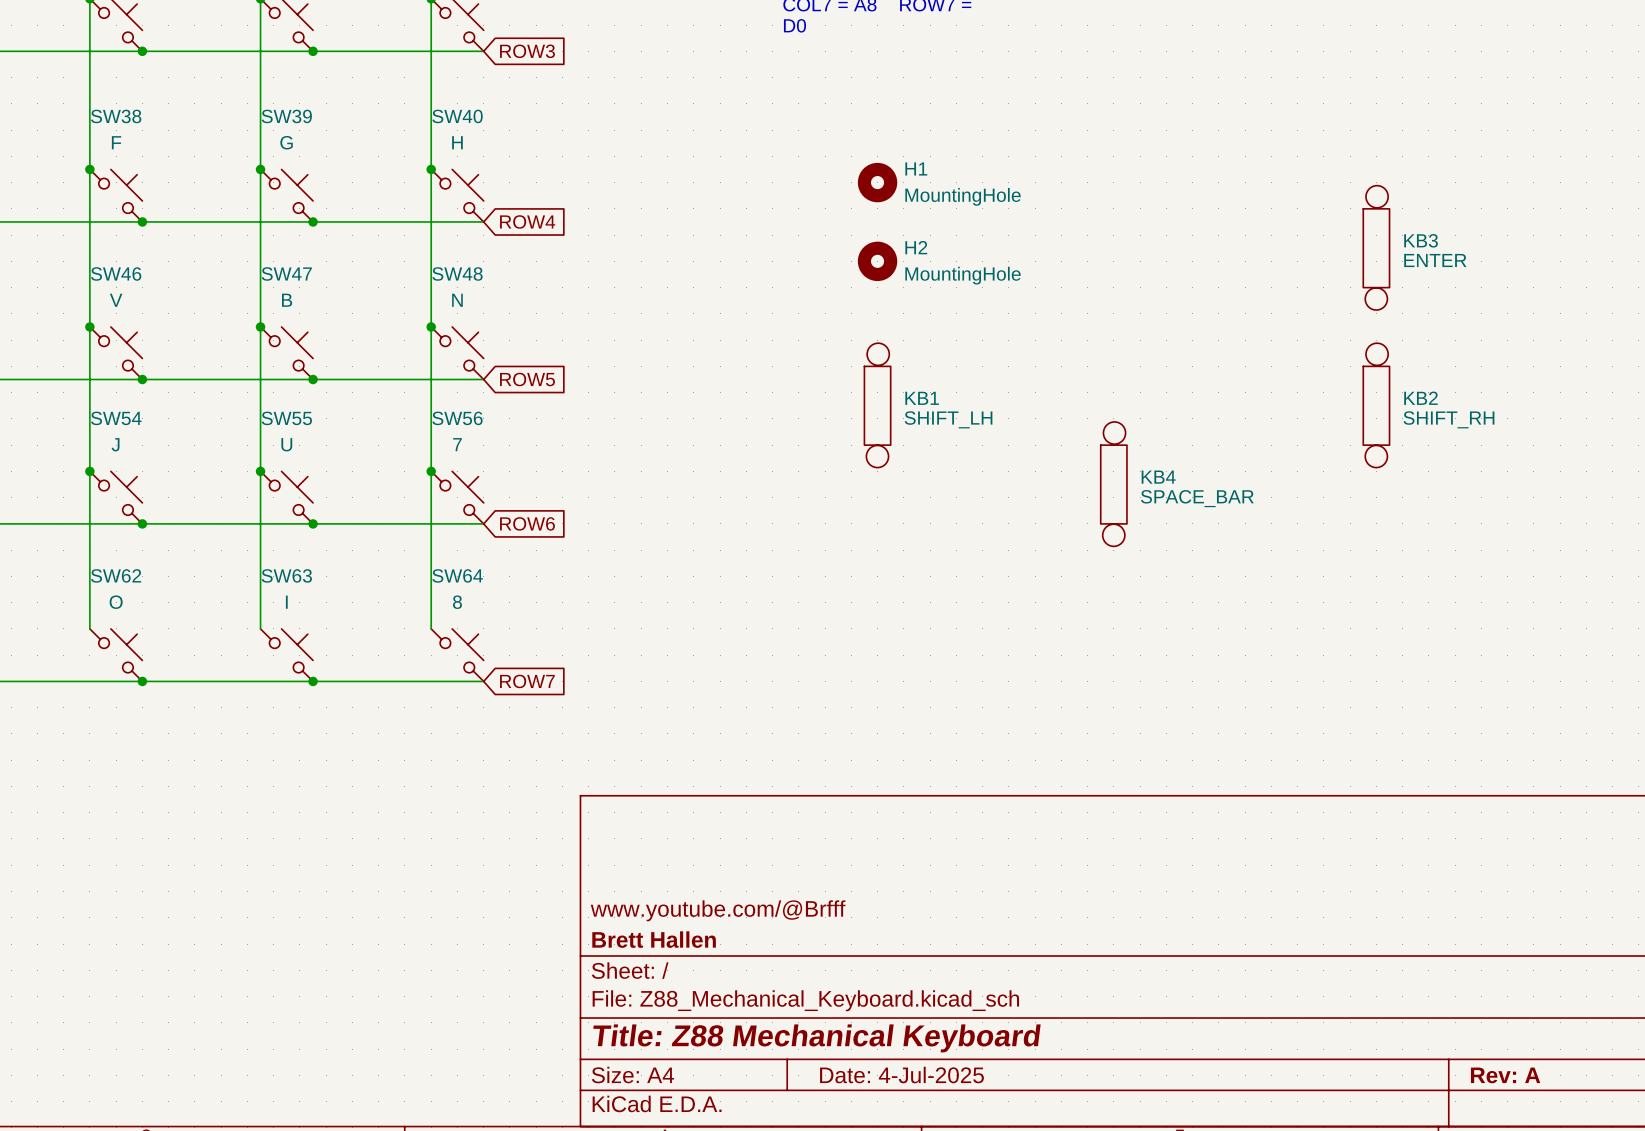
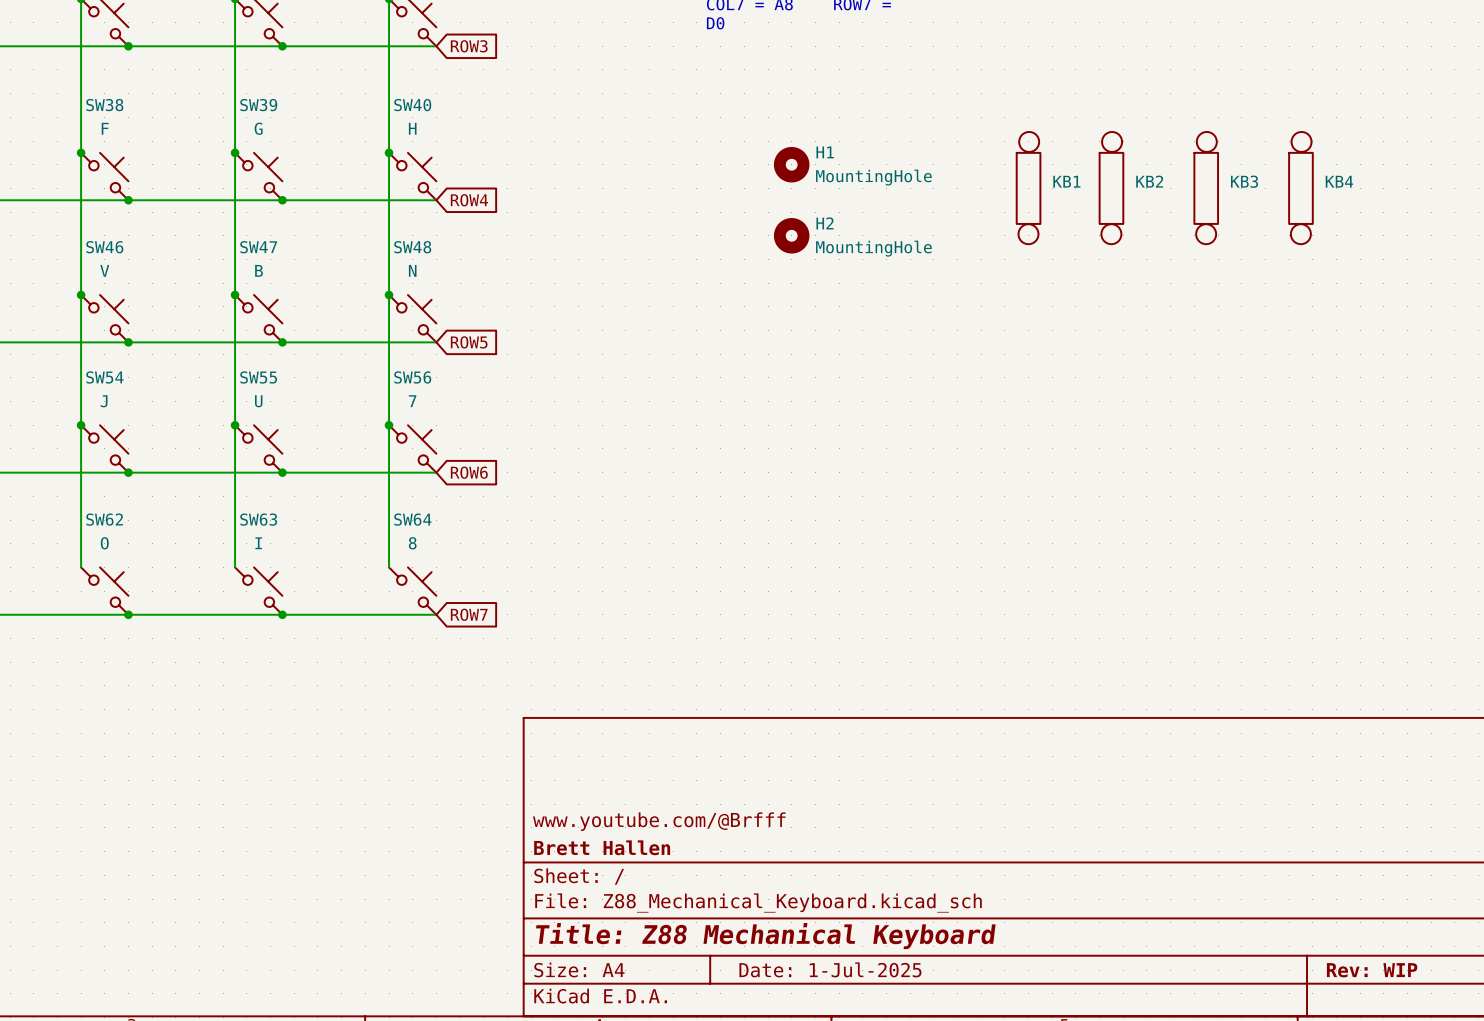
KB3 position: (1376, 247) -> (1206, 188)
KB3 value: ENTER (1435, 260) -> none
KB1 position: (877, 405) -> (1028, 188)
KB2 position: (1376, 405) -> (1111, 188)
KB1 value: SHIFT_LH (948, 419) -> none
KB2 value: SHIFT_RH (1448, 419) -> none
KB4 position: (1113, 484) -> (1300, 188)
KB4 value: SPACE_BAR (1197, 498) -> none
title block: Date: 4-Jul-2025 (901, 1075) -> Date: 1-Jul-2025 (830, 969)
title block: Rev: A (1505, 1075) -> Rev: WIP (1372, 970)

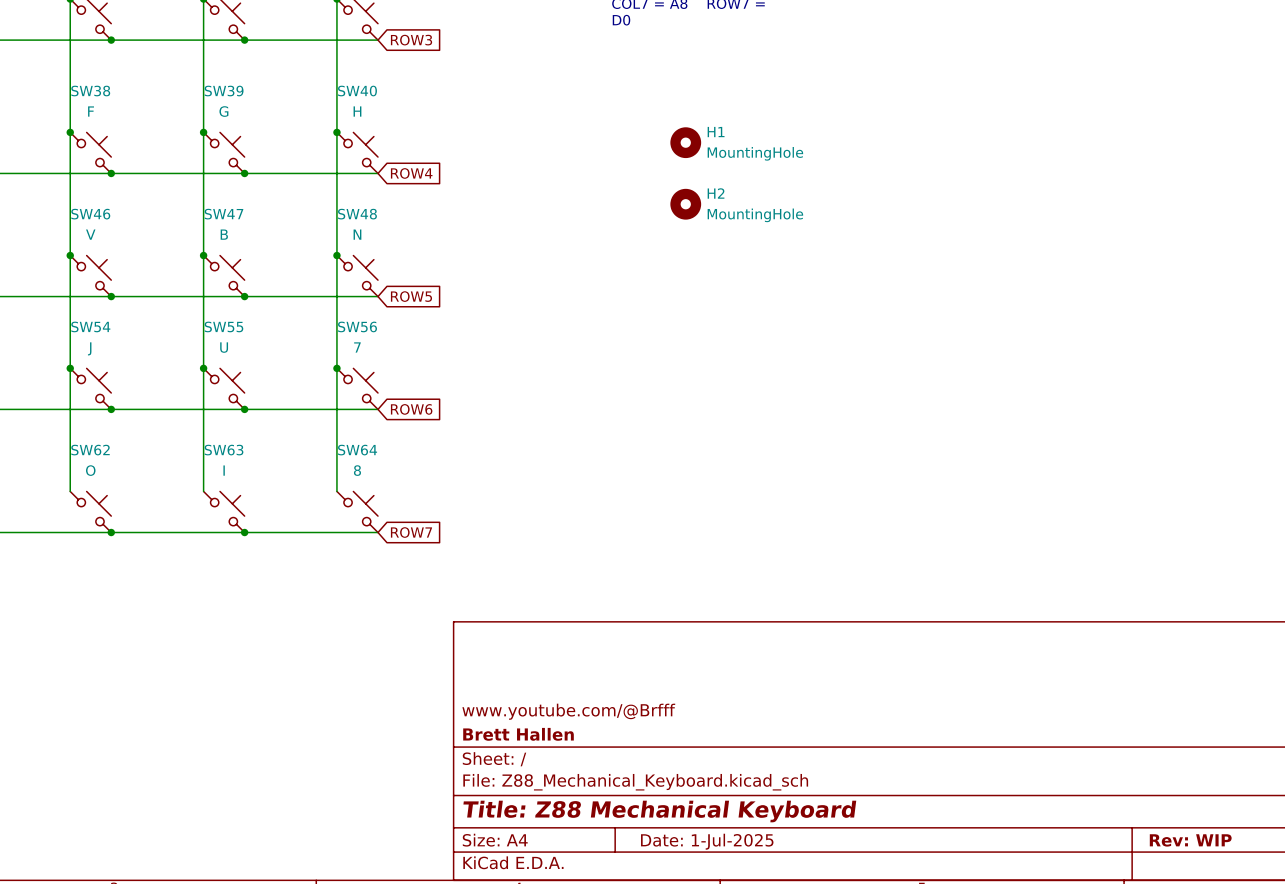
KB1: (1028, 188) -> none
KB2: (1111, 188) -> none
KB3: (1206, 188) -> none
KB4: (1300, 188) -> none

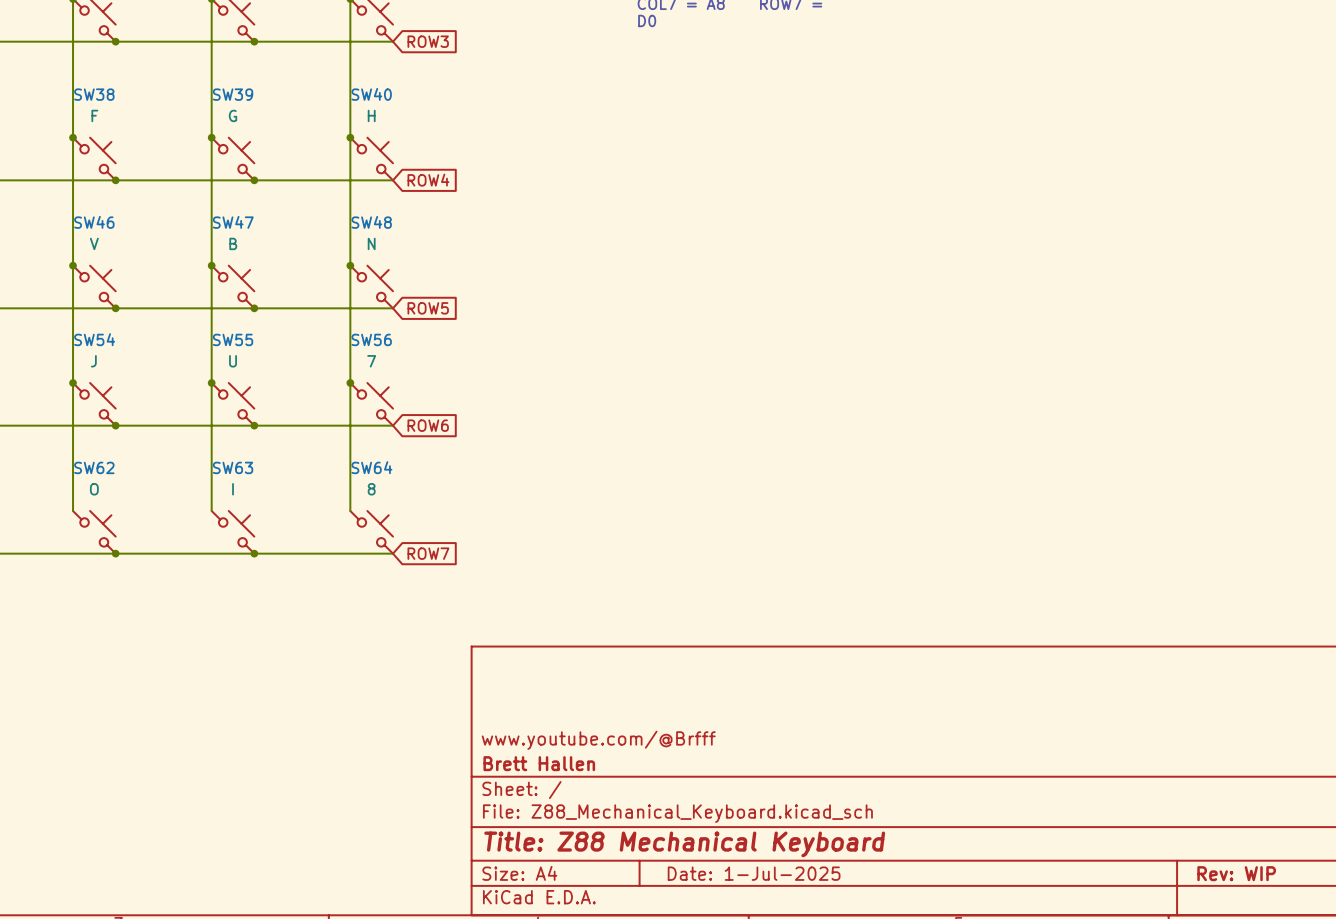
H1: MountingHole (685, 142) -> none
H2: MountingHole (685, 204) -> none

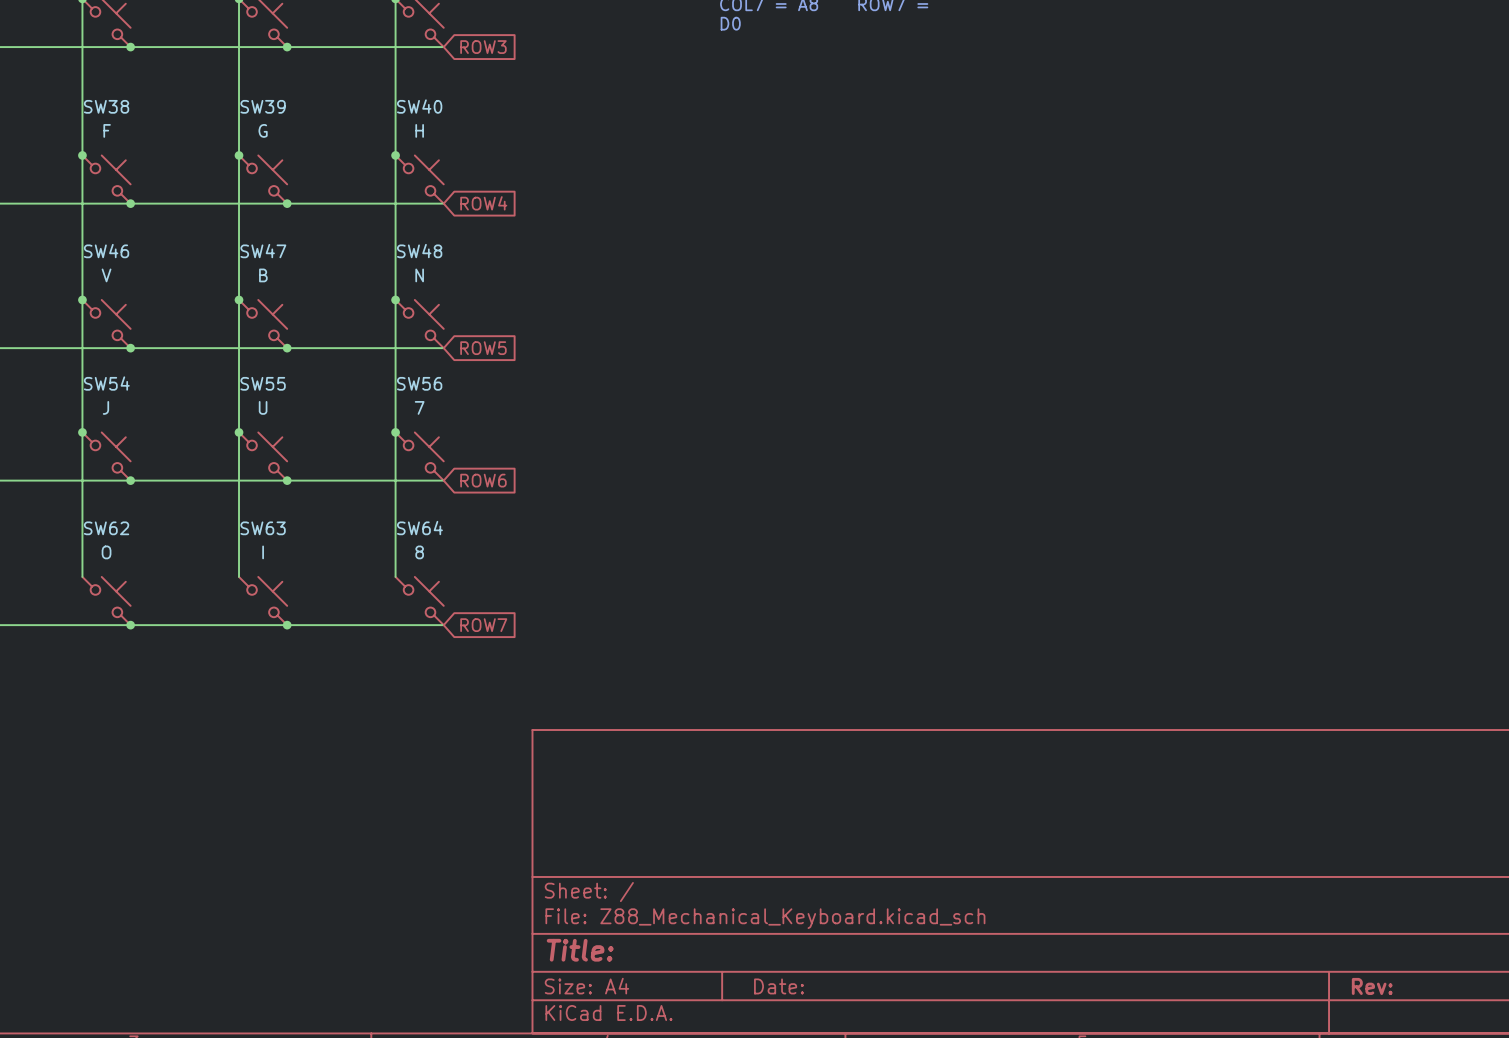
title block: www.youtube.com/@Brfff (598, 740) -> none
title block: Brett Hallen (539, 763) -> none
title block: Title: Z88 Mechanical Keyboard (684, 844) -> Title: (580, 950)
title block: Date: 1-Jul-2025 (754, 873) -> Date: (778, 986)
title block: Rev: WIP (1236, 873) -> Rev: (1372, 986)

